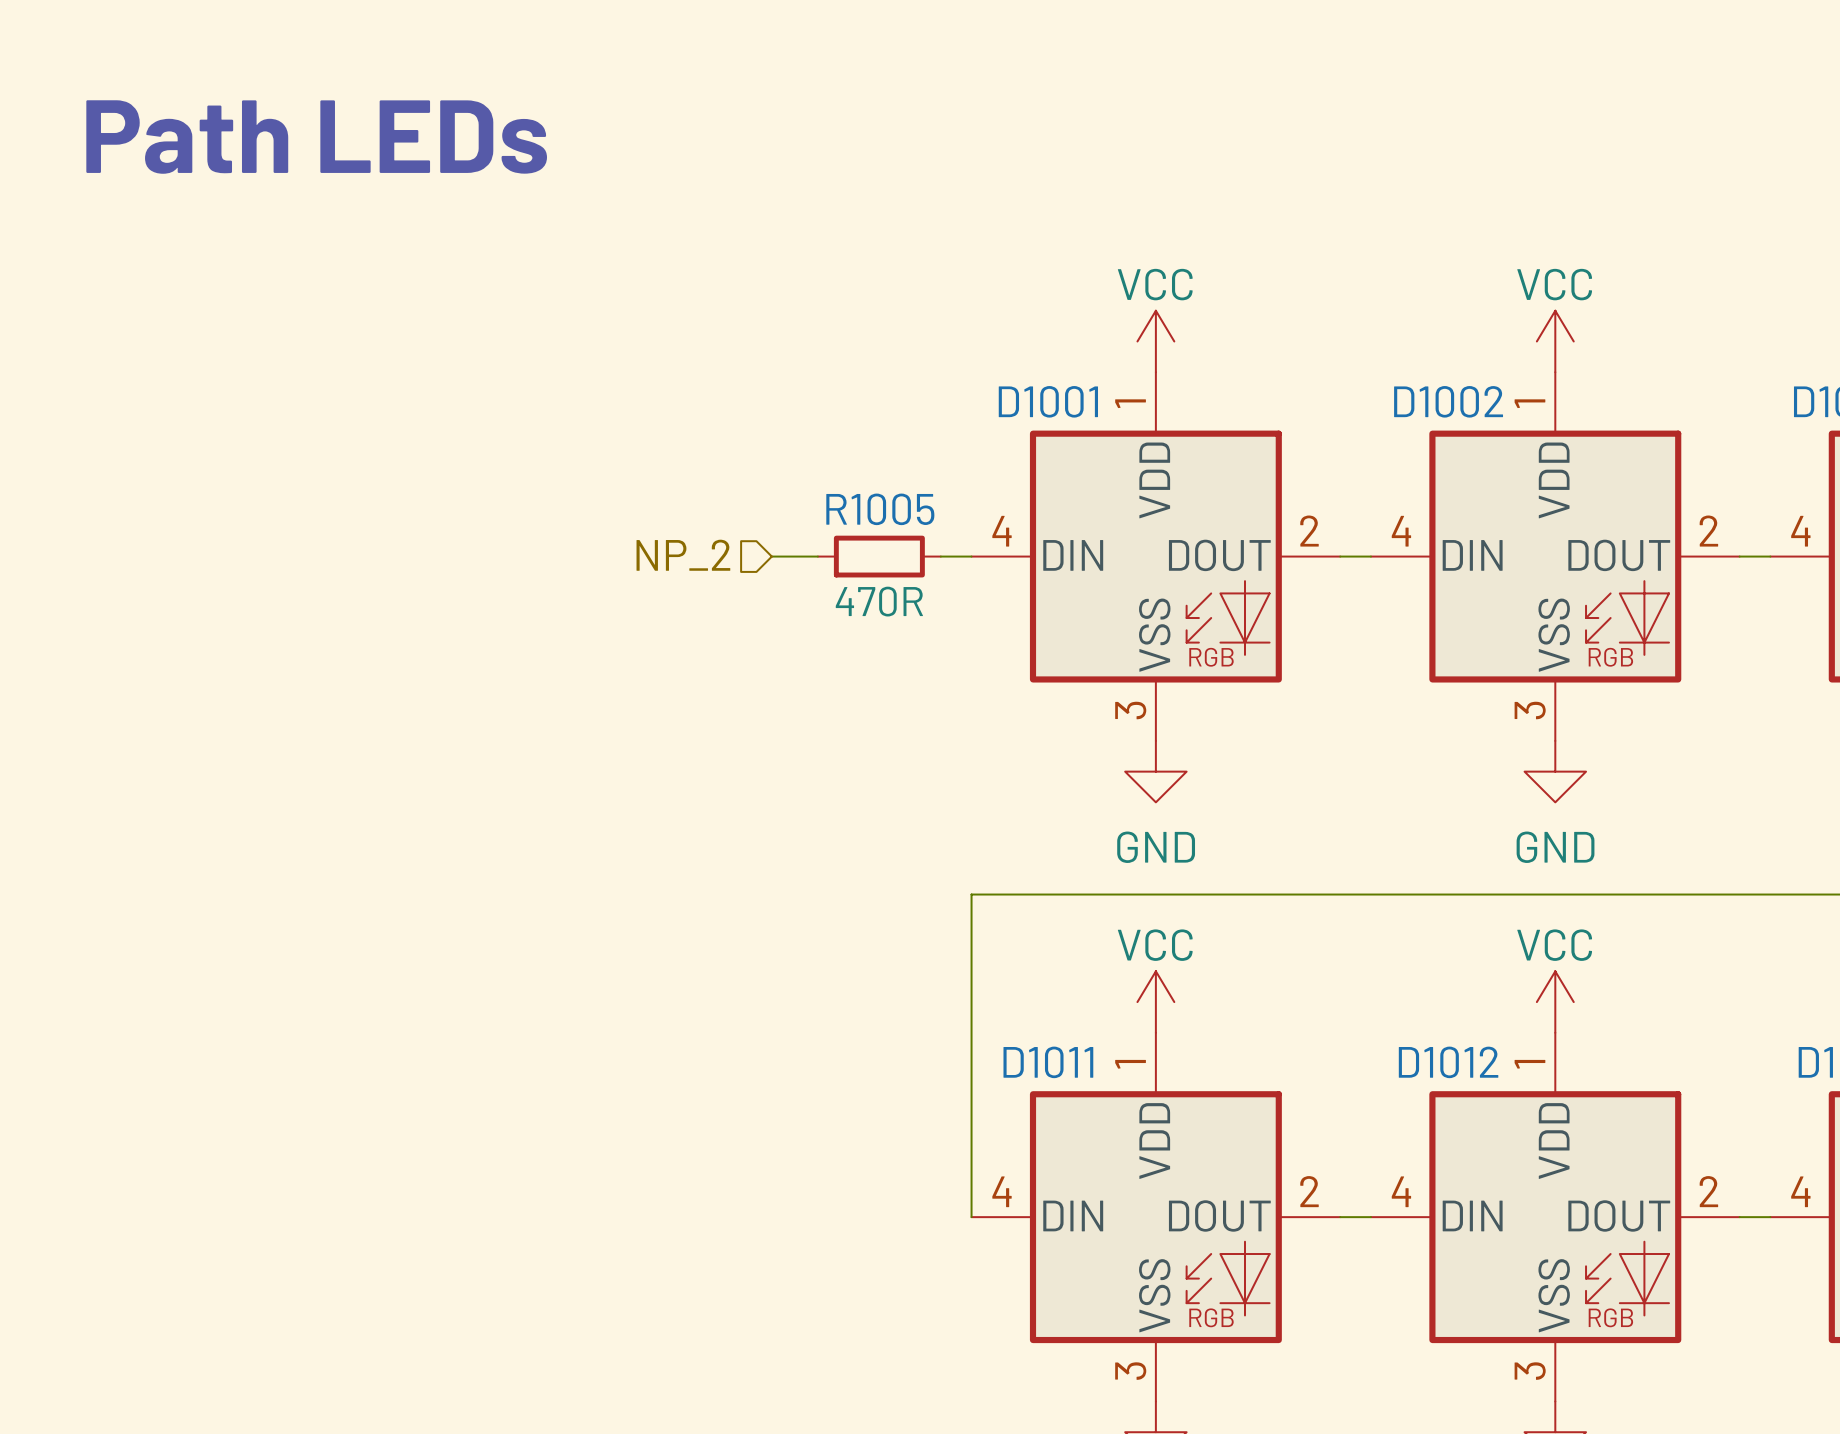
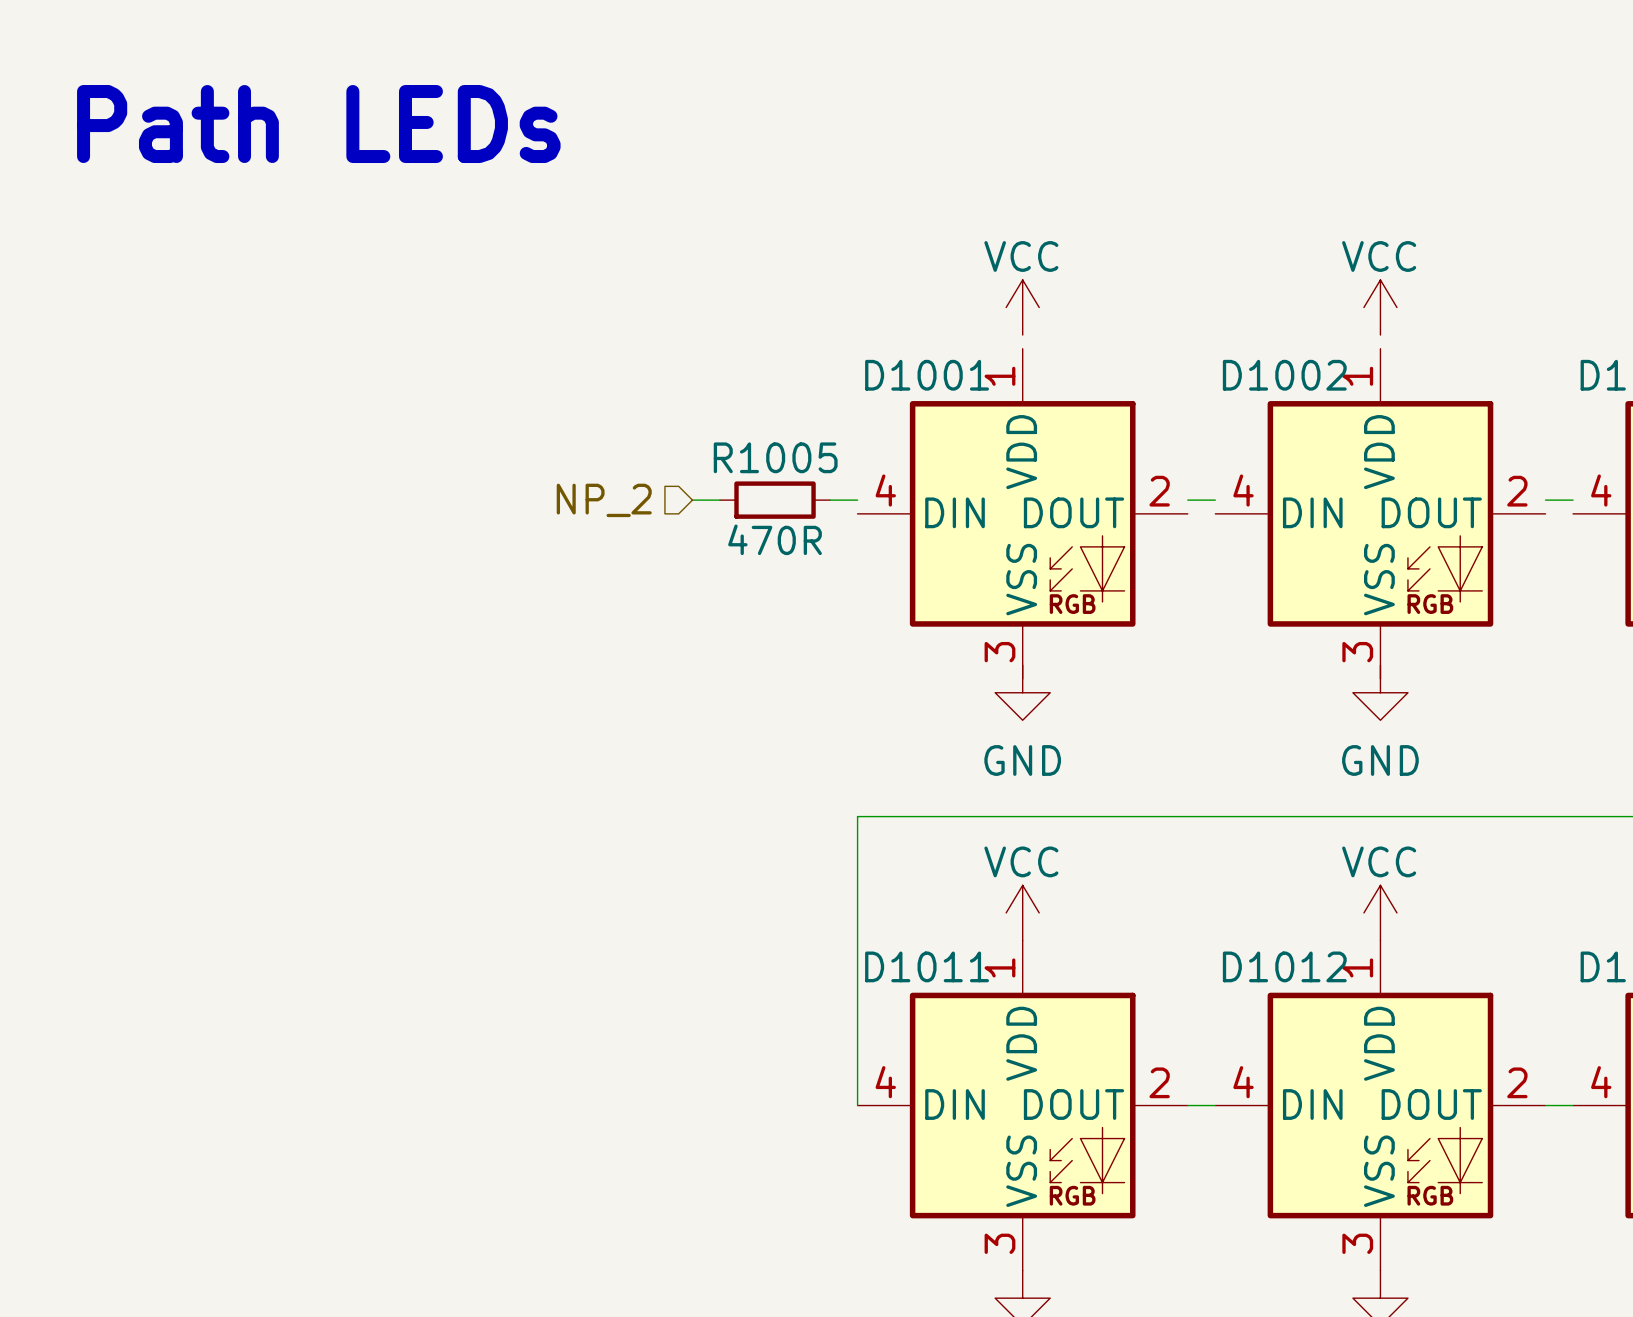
text position: Path LEDs (316, 137) -> Path LEDs (318, 124)
power symbol position: VCC (1155, 341) -> VCC (1022, 307)
power symbol position: VCC (1555, 341) -> VCC (1380, 307)
wire: none -> (692, 500) (719, 500)
hierarchical label position: NP_2 (683, 555) -> NP_2 (604, 500)
wire: (771, 556) (817, 556) -> none
R1005 position: (879, 556) -> (775, 500)
wire: (940, 556) (971, 556) -> (830, 500) (857, 500)
wire: (1340, 556) (1370, 556) -> (1187, 500) (1215, 500)
wire: (1739, 556) (1770, 556) -> (1545, 500) (1573, 500)
power symbol position: GND (1155, 771) -> GND (1022, 692)
power symbol position: GND (1555, 771) -> GND (1380, 692)

